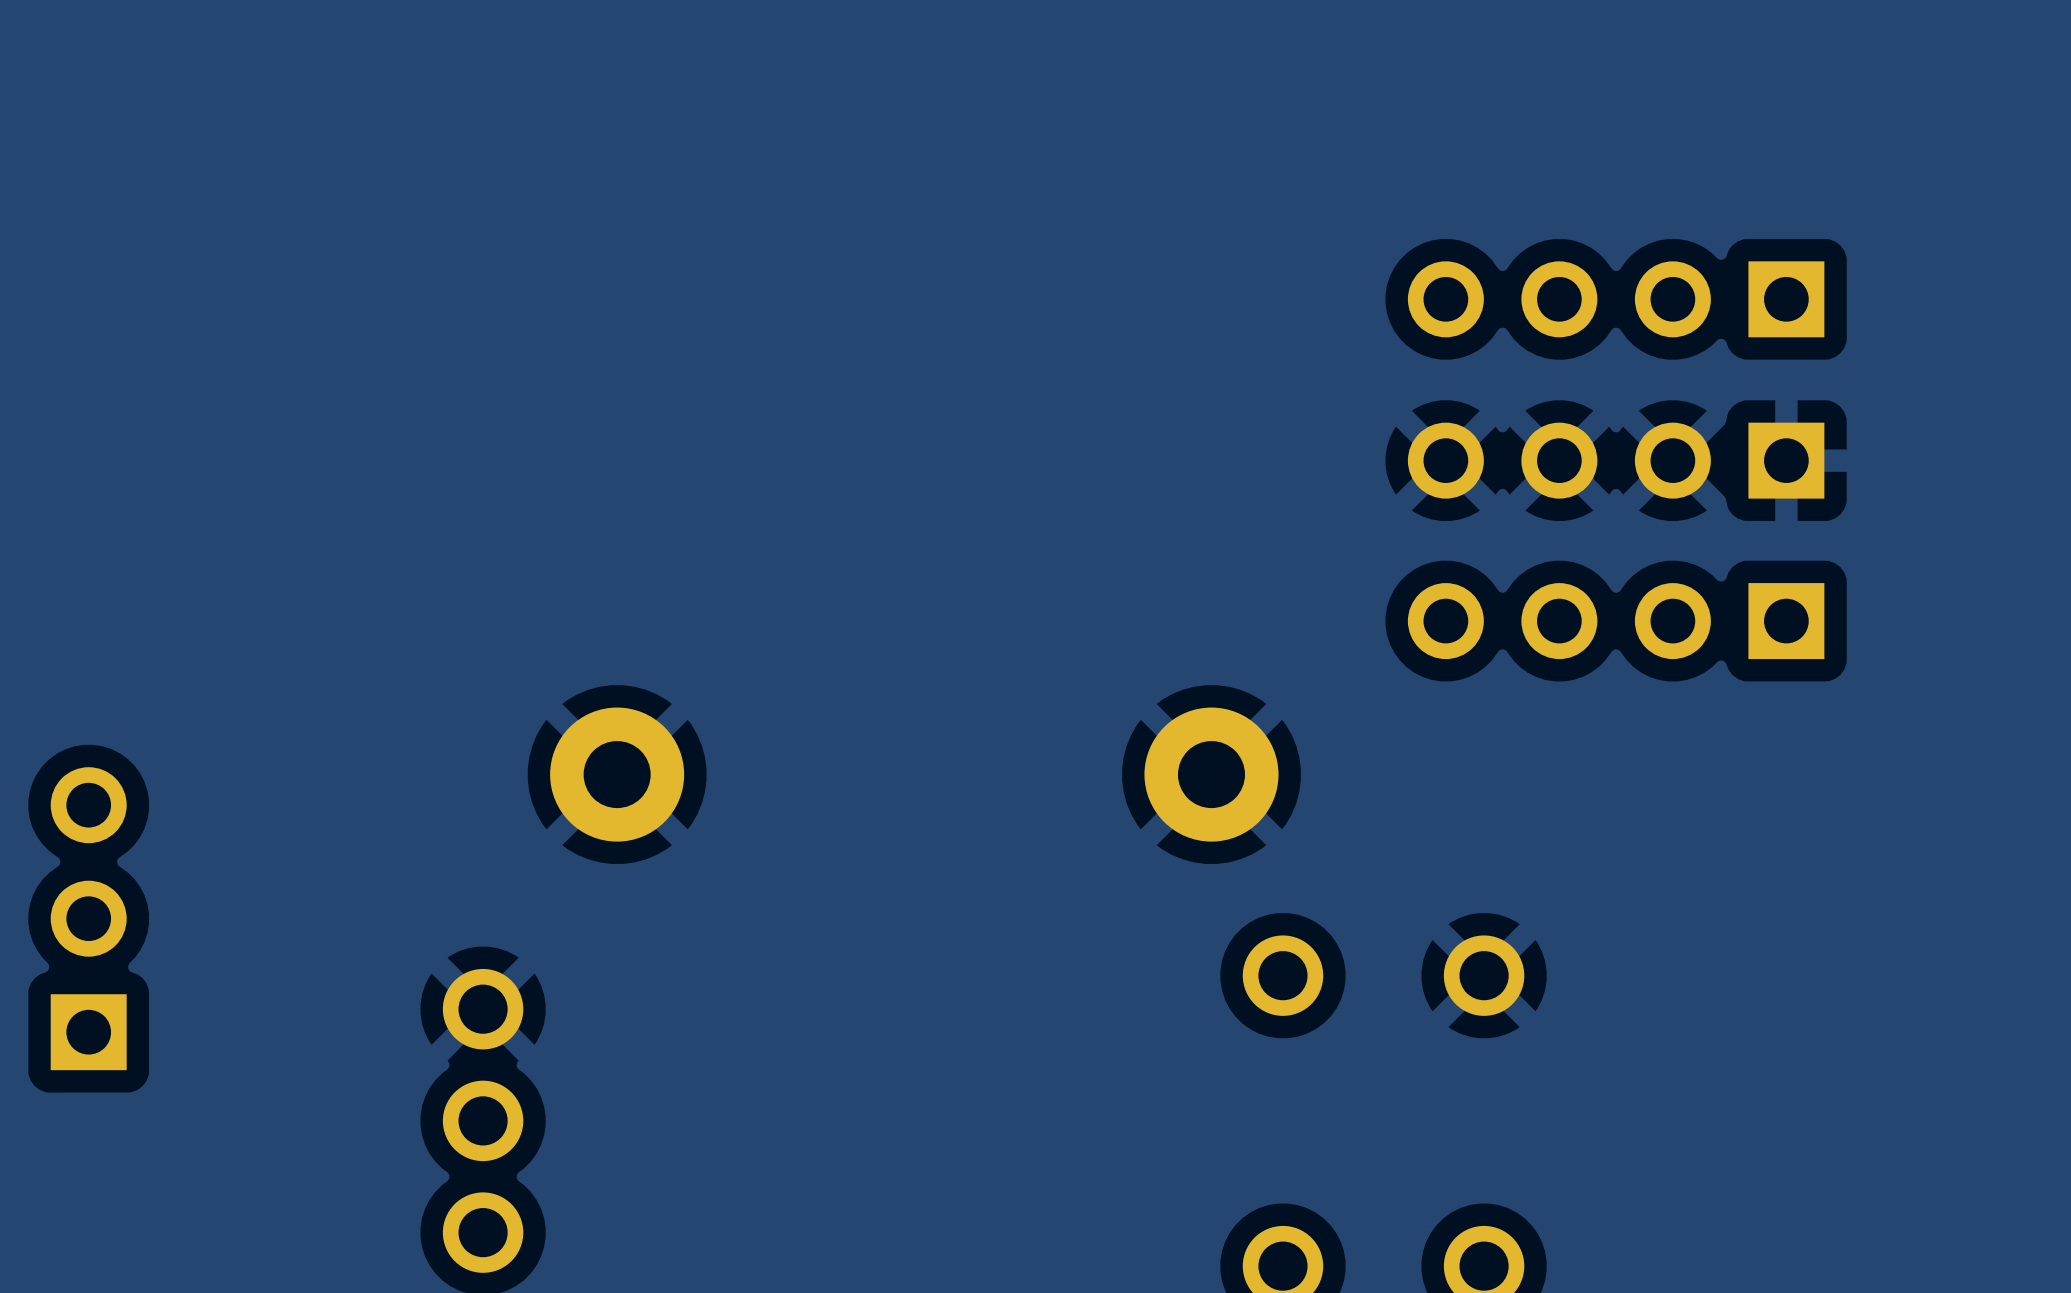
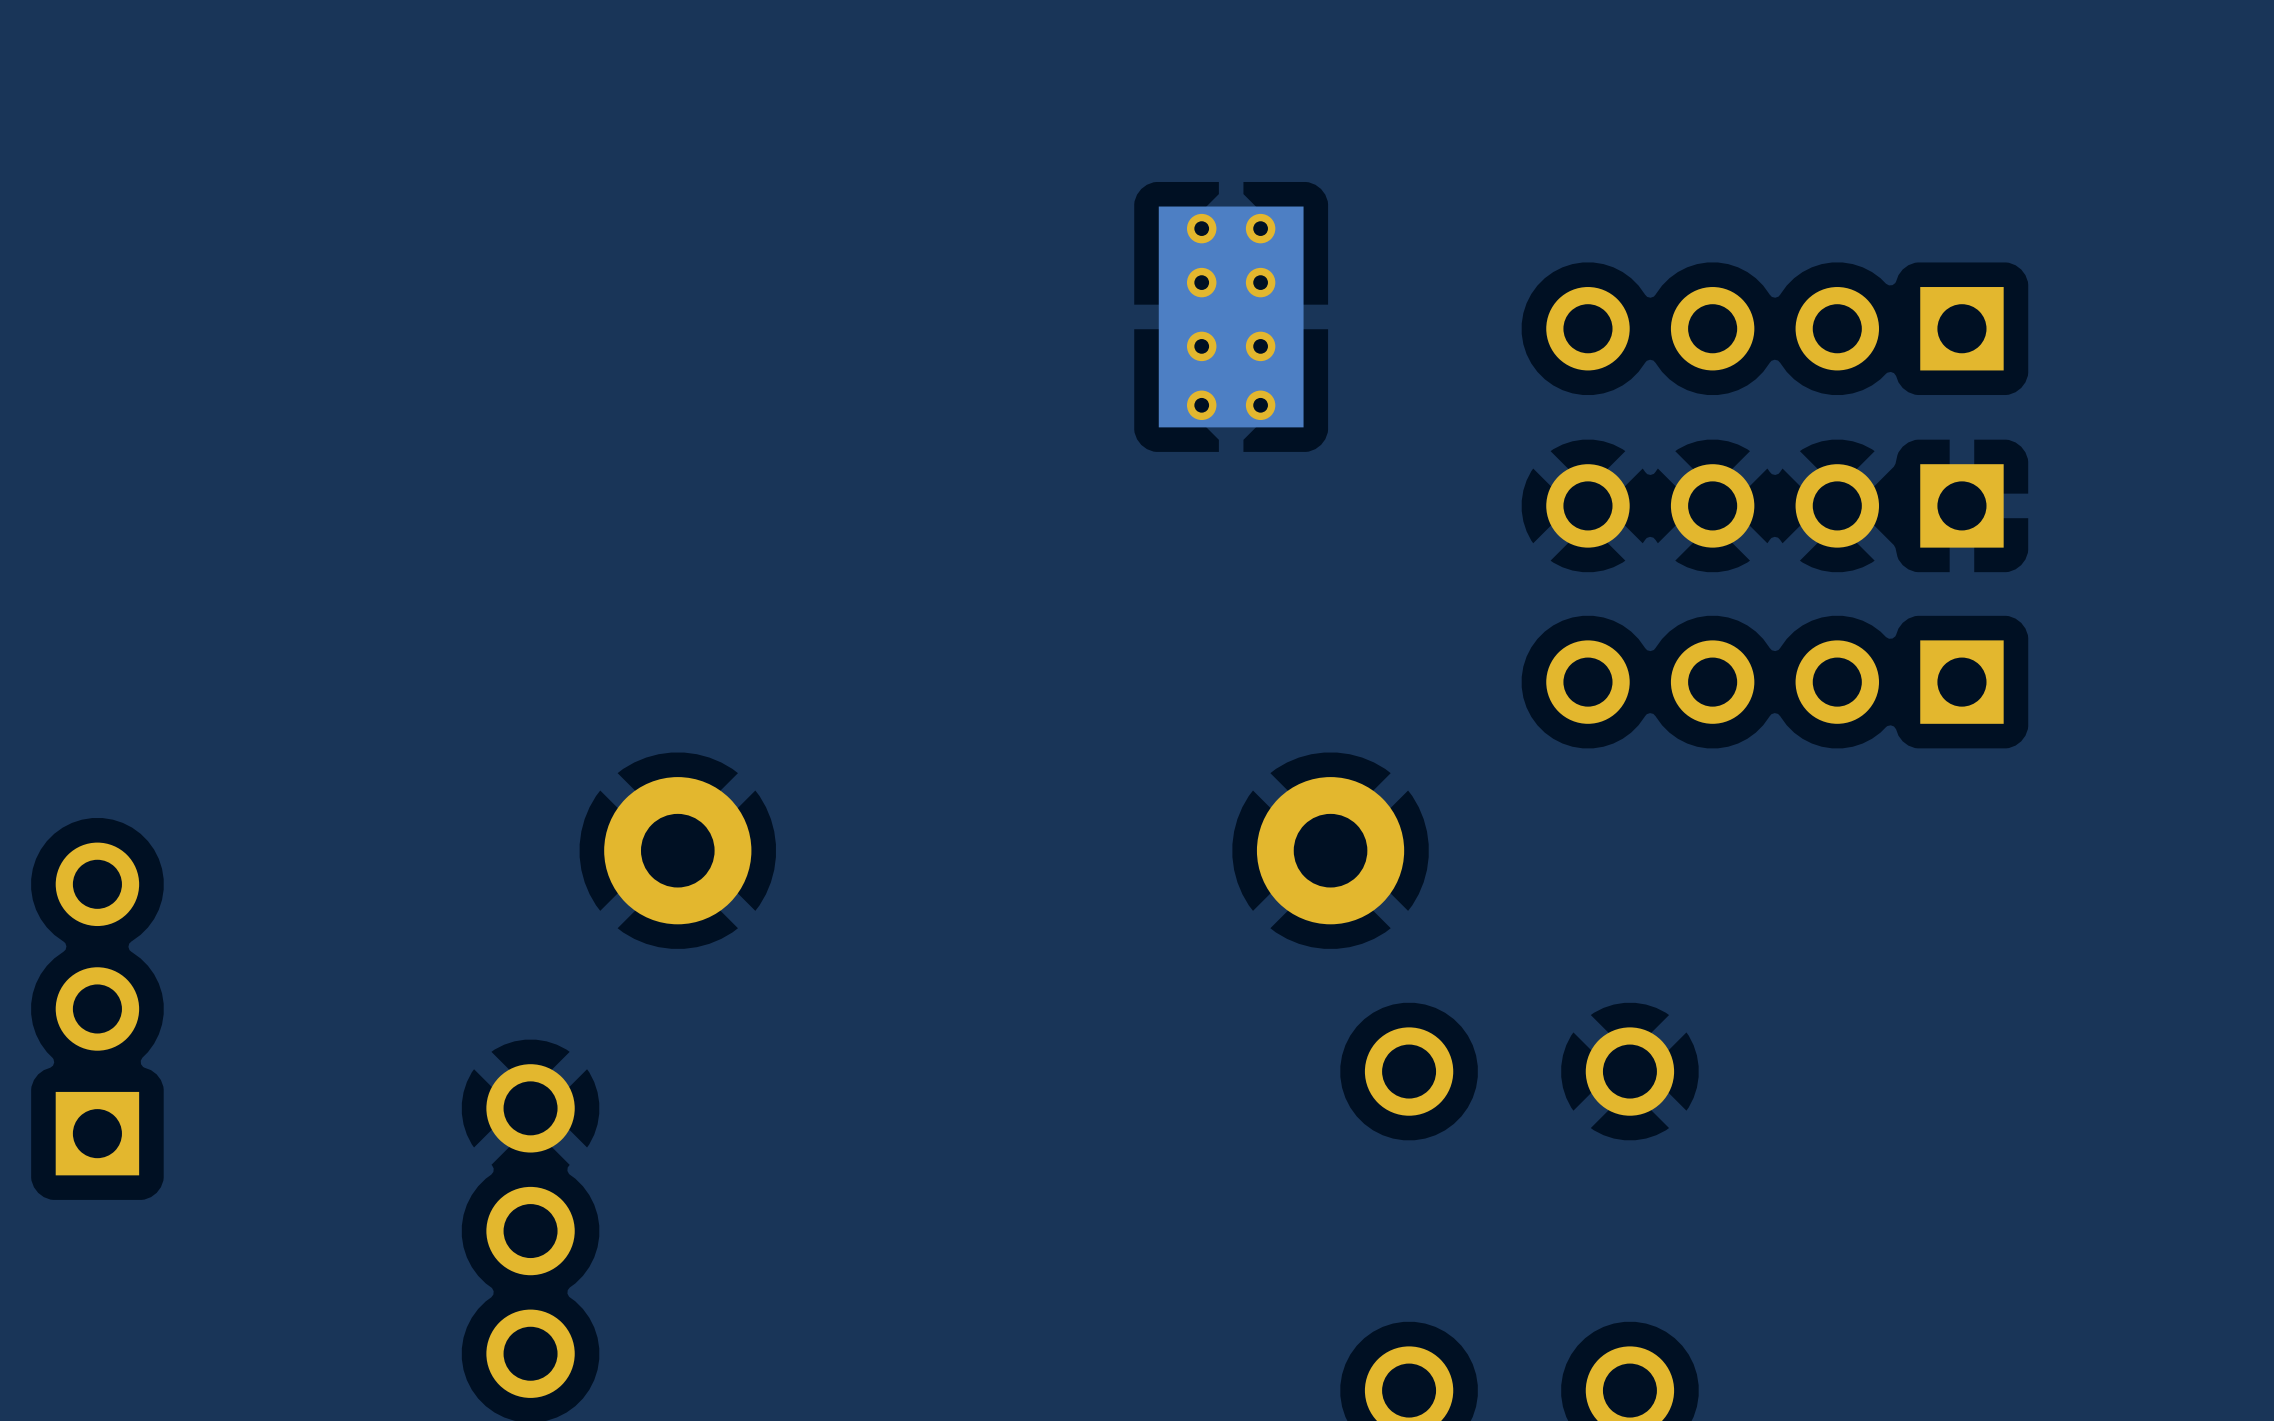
part: none -> (1231, 316)

